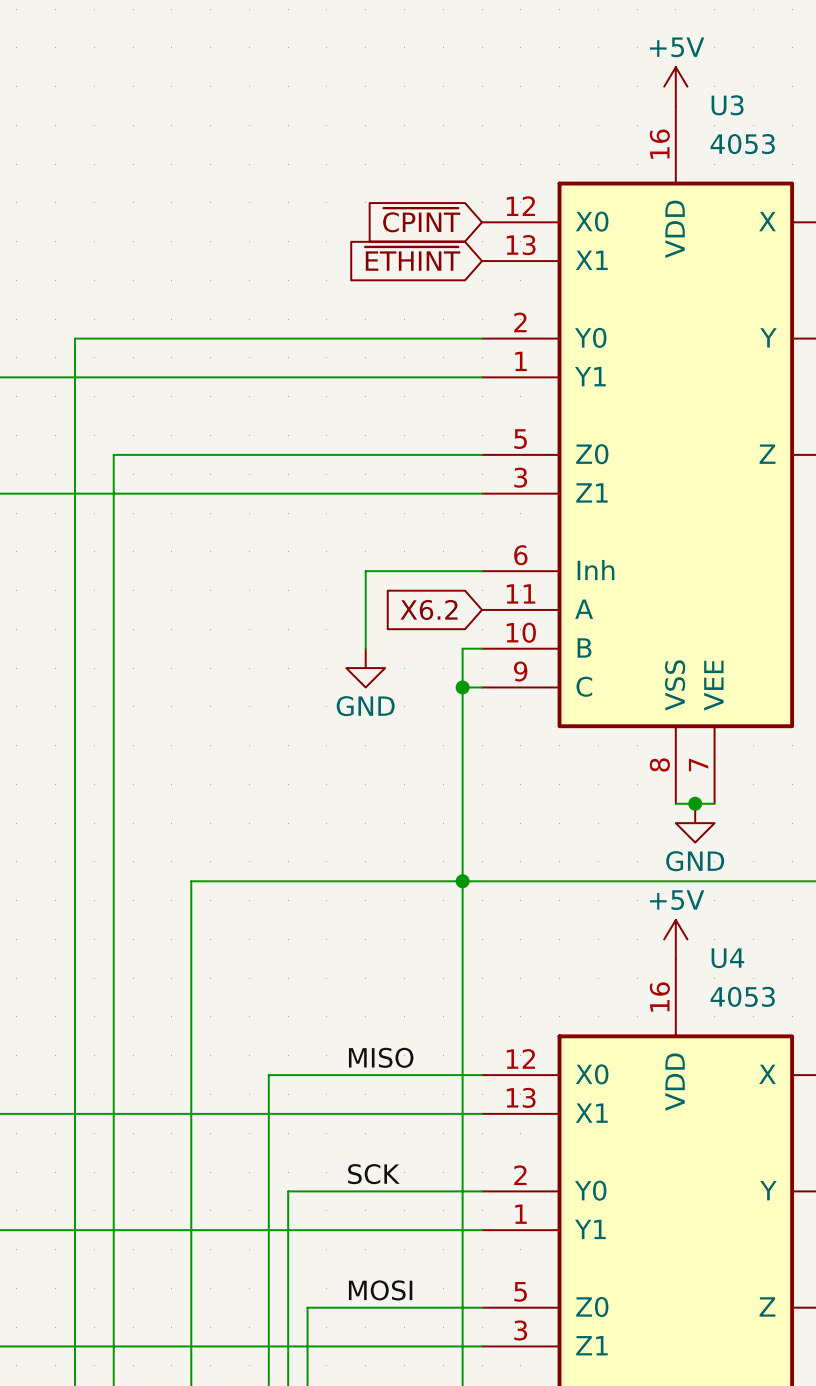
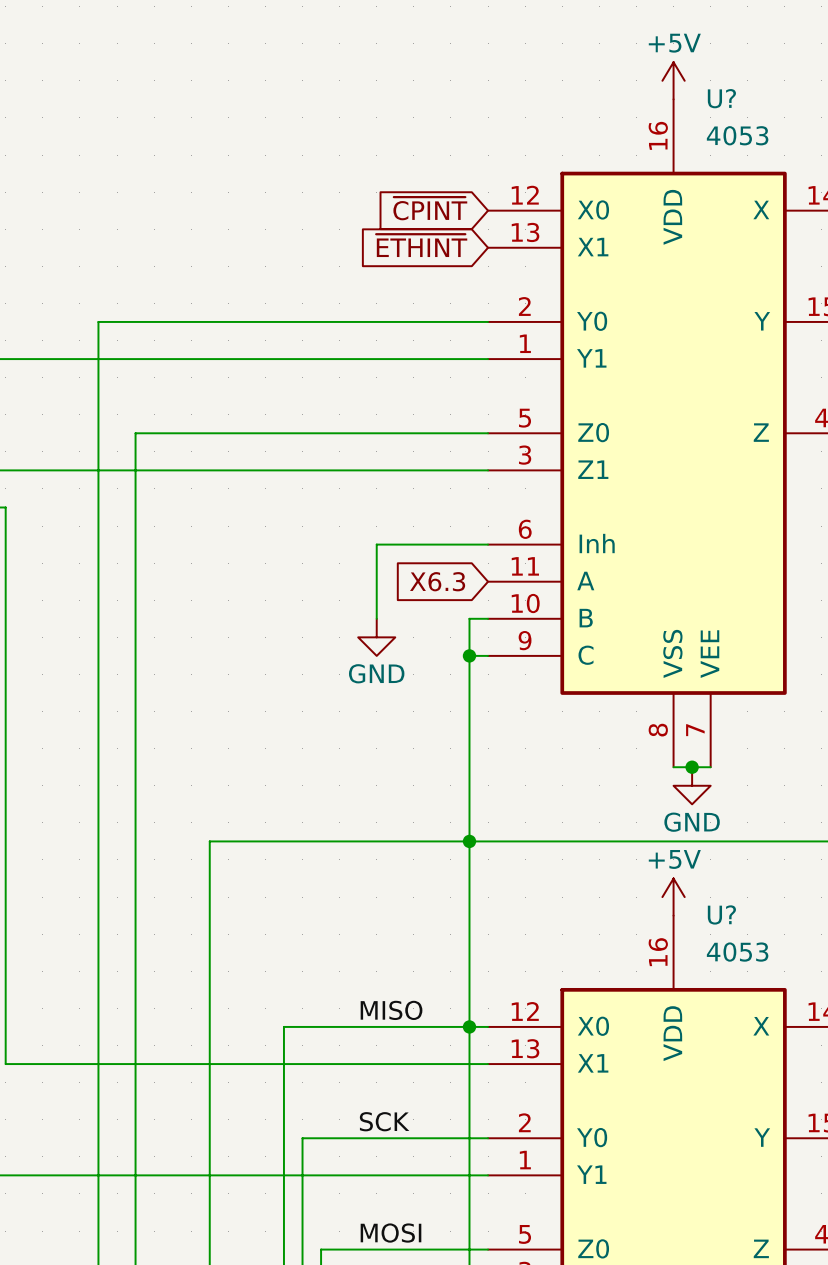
U3 name: U3 (727, 105) -> U? (721, 98)
global label: X6.2 (429, 609) -> X6.3 (437, 581)
U4 name: U4 (727, 958) -> U? (721, 914)
junction: none -> (469, 1026)

